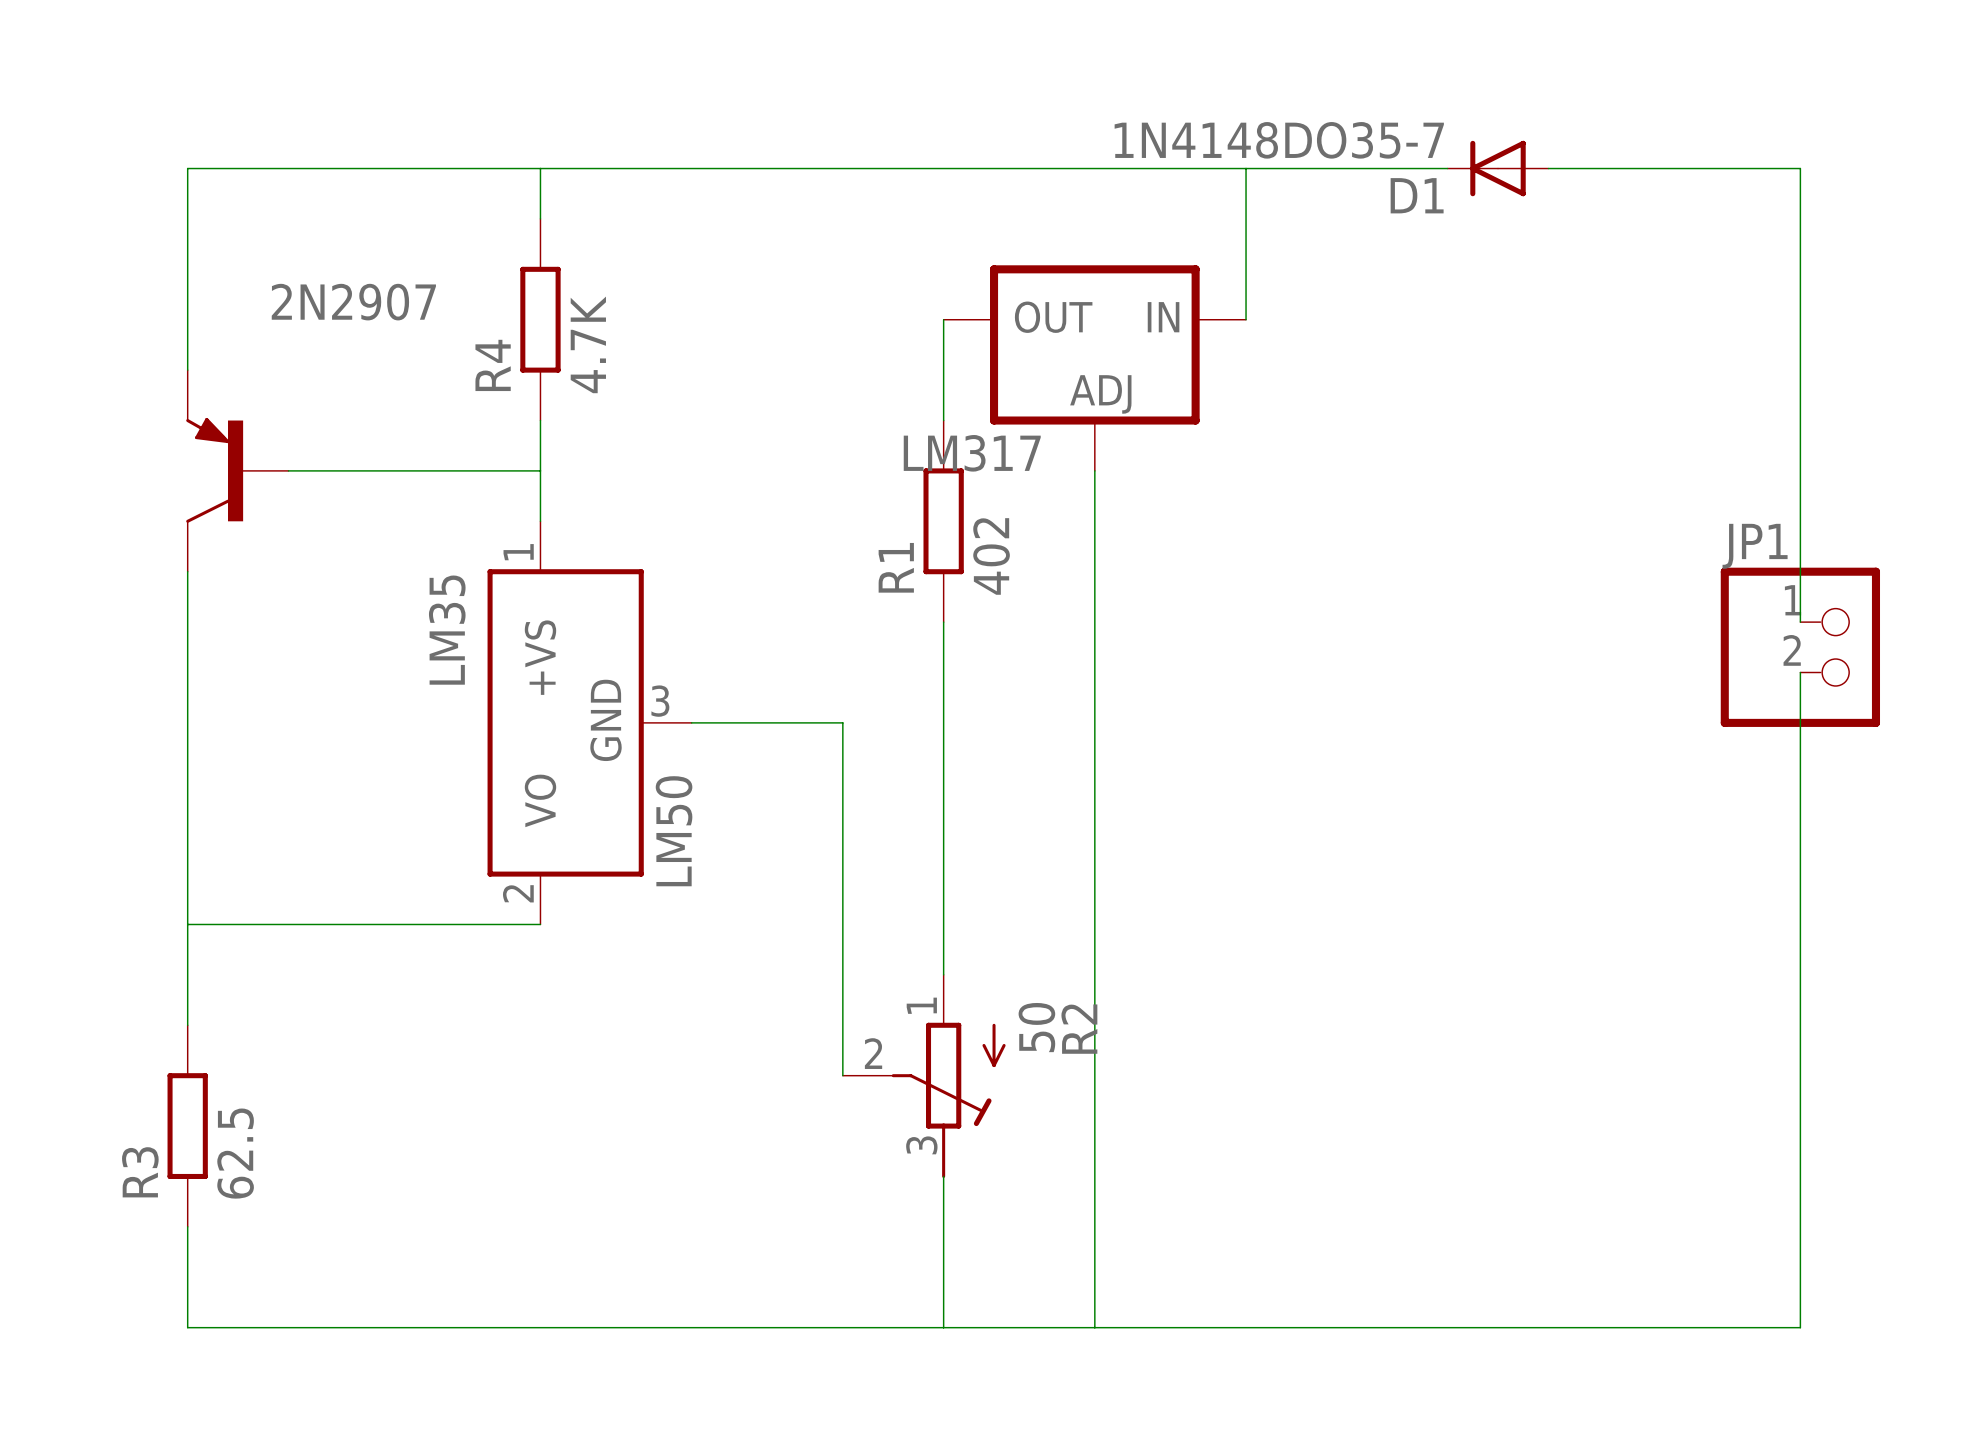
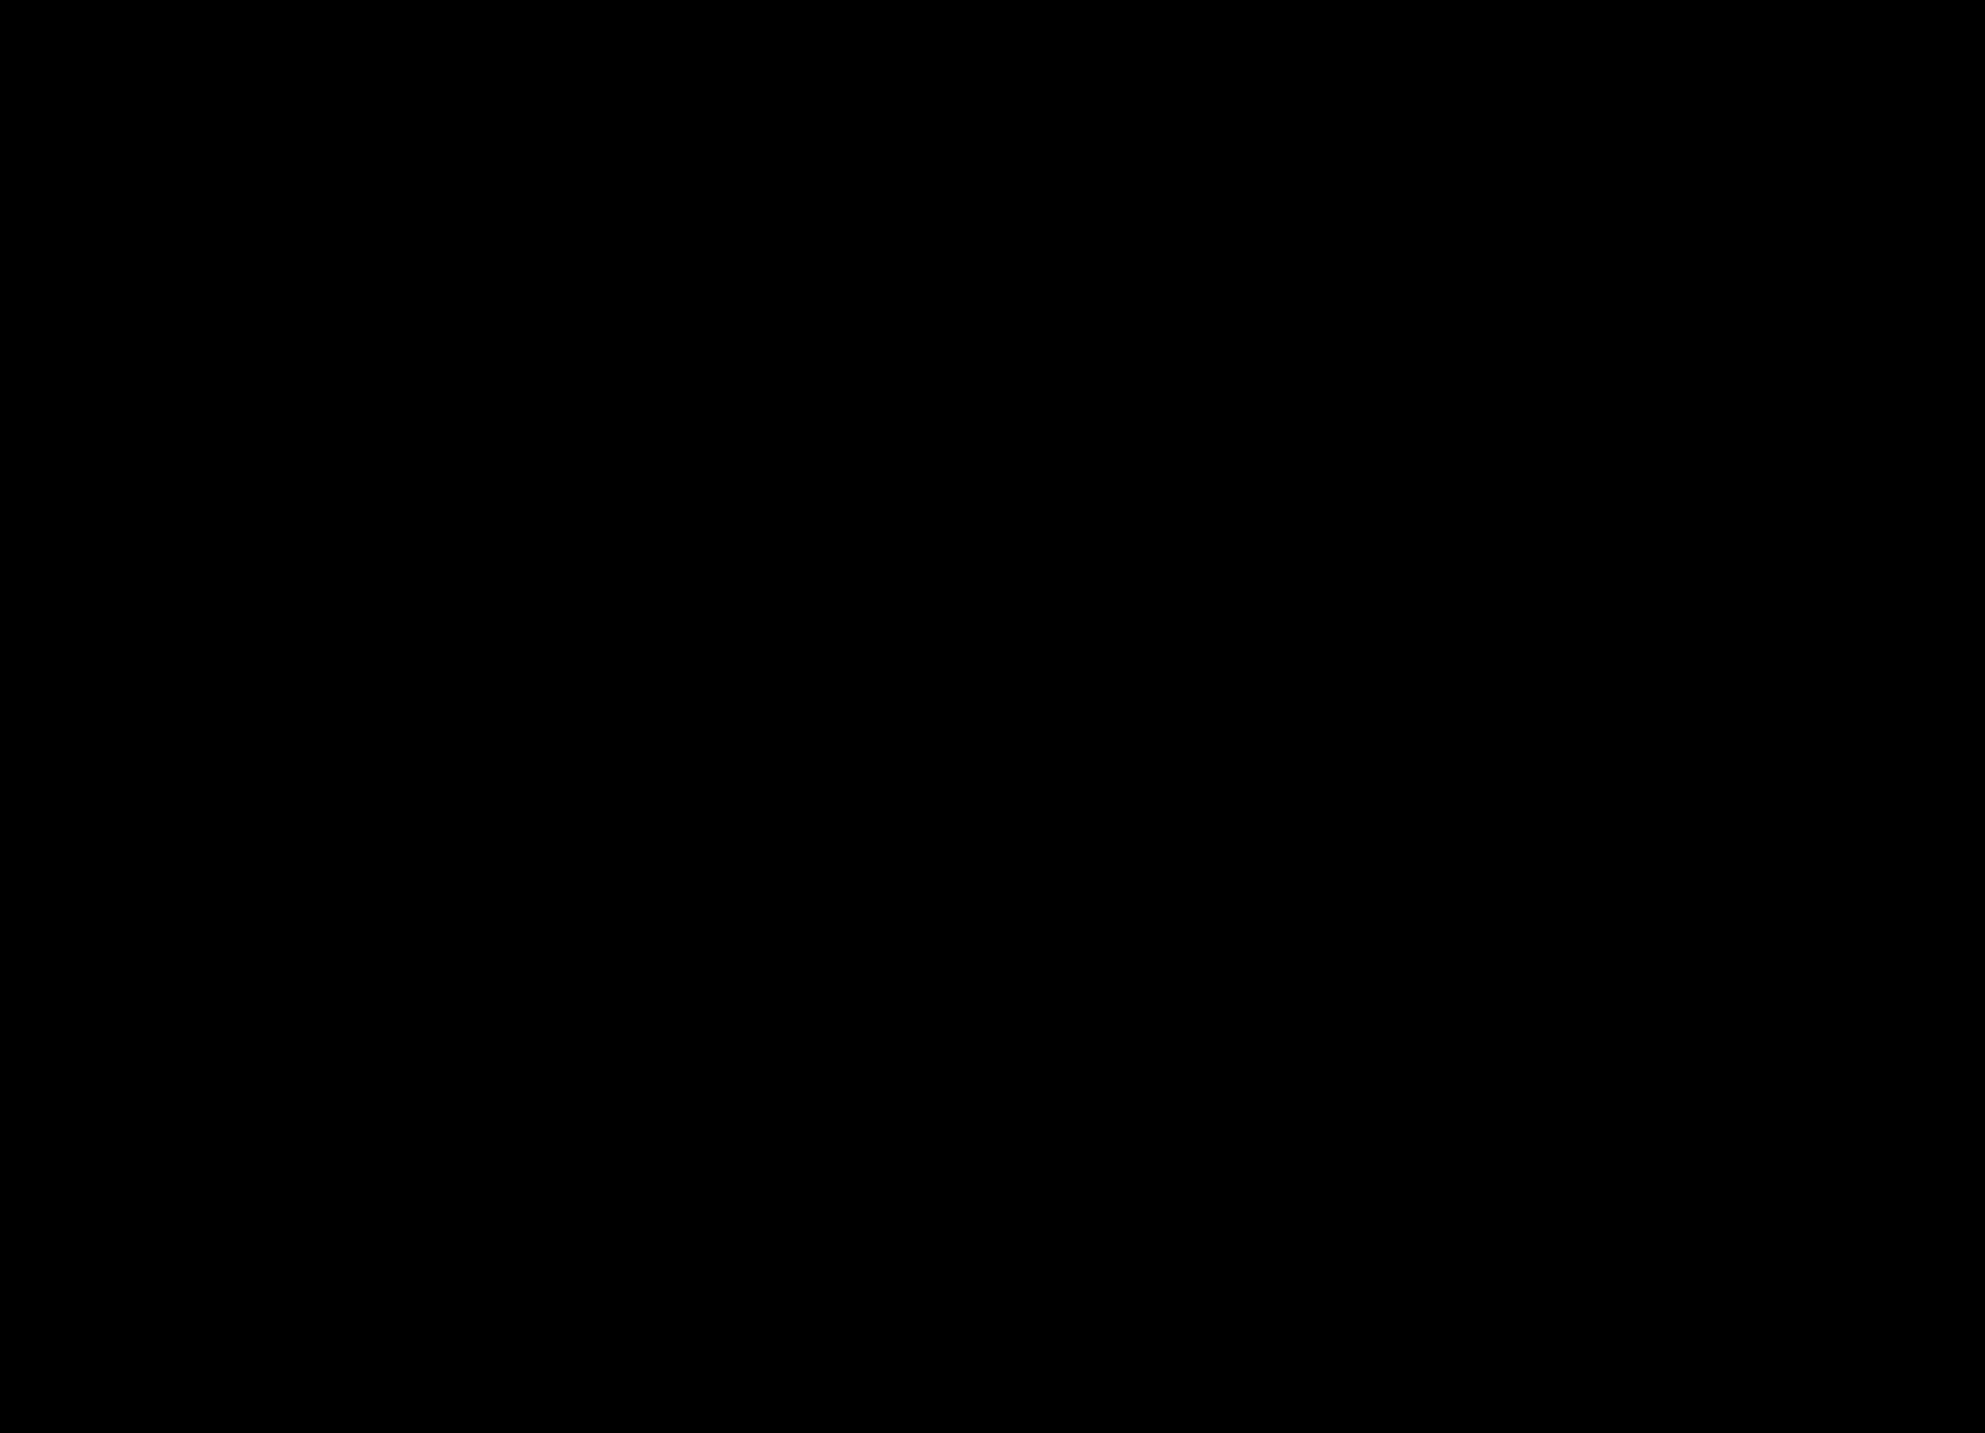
wire: (540, 168) (540, 218) -> none
wire: (1246, 168) (1246, 319) -> none
wire: (1447, 168) (187, 168) (187, 370) -> none
D1: 1N4148DO35-7 (1498, 168) -> none
wire: (1548, 168) (1800, 168) (1800, 622) -> none
R4: 4.7K (540, 319) -> none
wire: (943, 319) (943, 420) -> none
LM317: (1094, 368) -> none
wire: (540, 420) (540, 521) -> none
2N2907: (237, 470) -> none
wire: (288, 470) (540, 470) -> none
wire: (1094, 470) (1094, 1327) -> none
R1: 402 (943, 521) -> none
wire: (187, 571) (187, 1025) -> none
wire: (943, 622) (943, 974) -> none
JP1: (1800, 647) -> none
wire: (1800, 672) (1800, 1327) (187, 1327) (187, 1226) -> none
LM35: LM50 (589, 722) -> none
wire: (691, 722) (842, 722) (842, 1075) -> none
wire: (187, 924) (540, 924) -> none
R2: 50 (924, 1076) -> none
R3: 62.5 (187, 1126) -> none
wire: (943, 1176) (943, 1327) -> none

